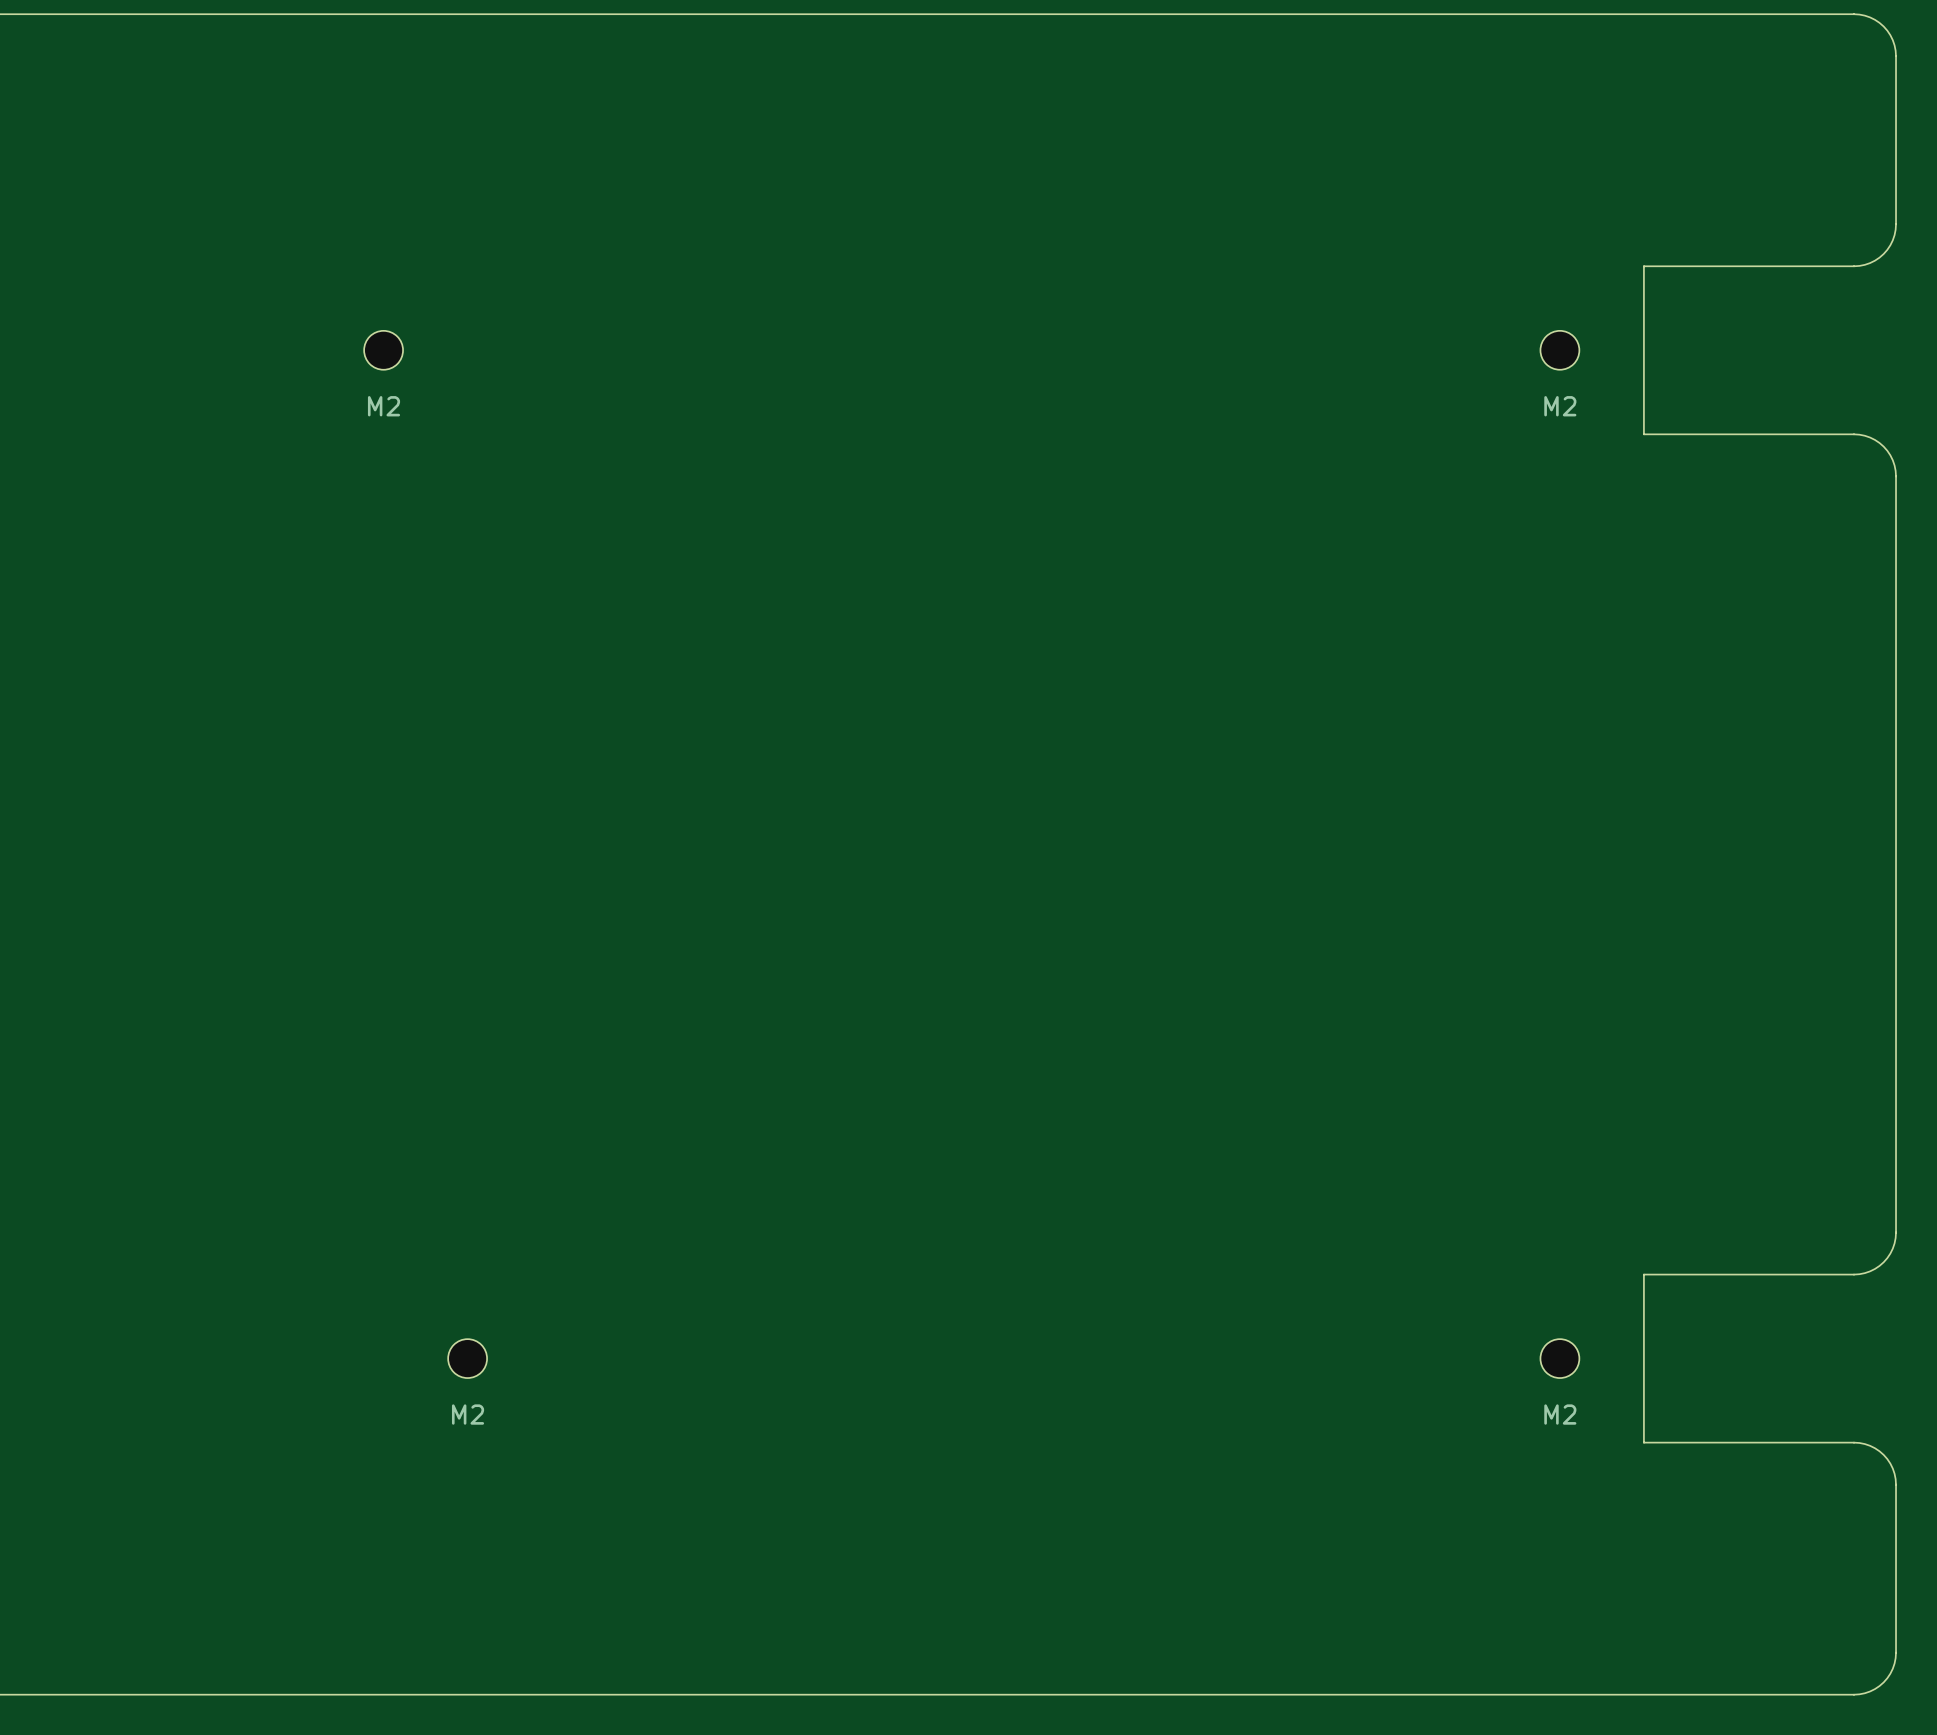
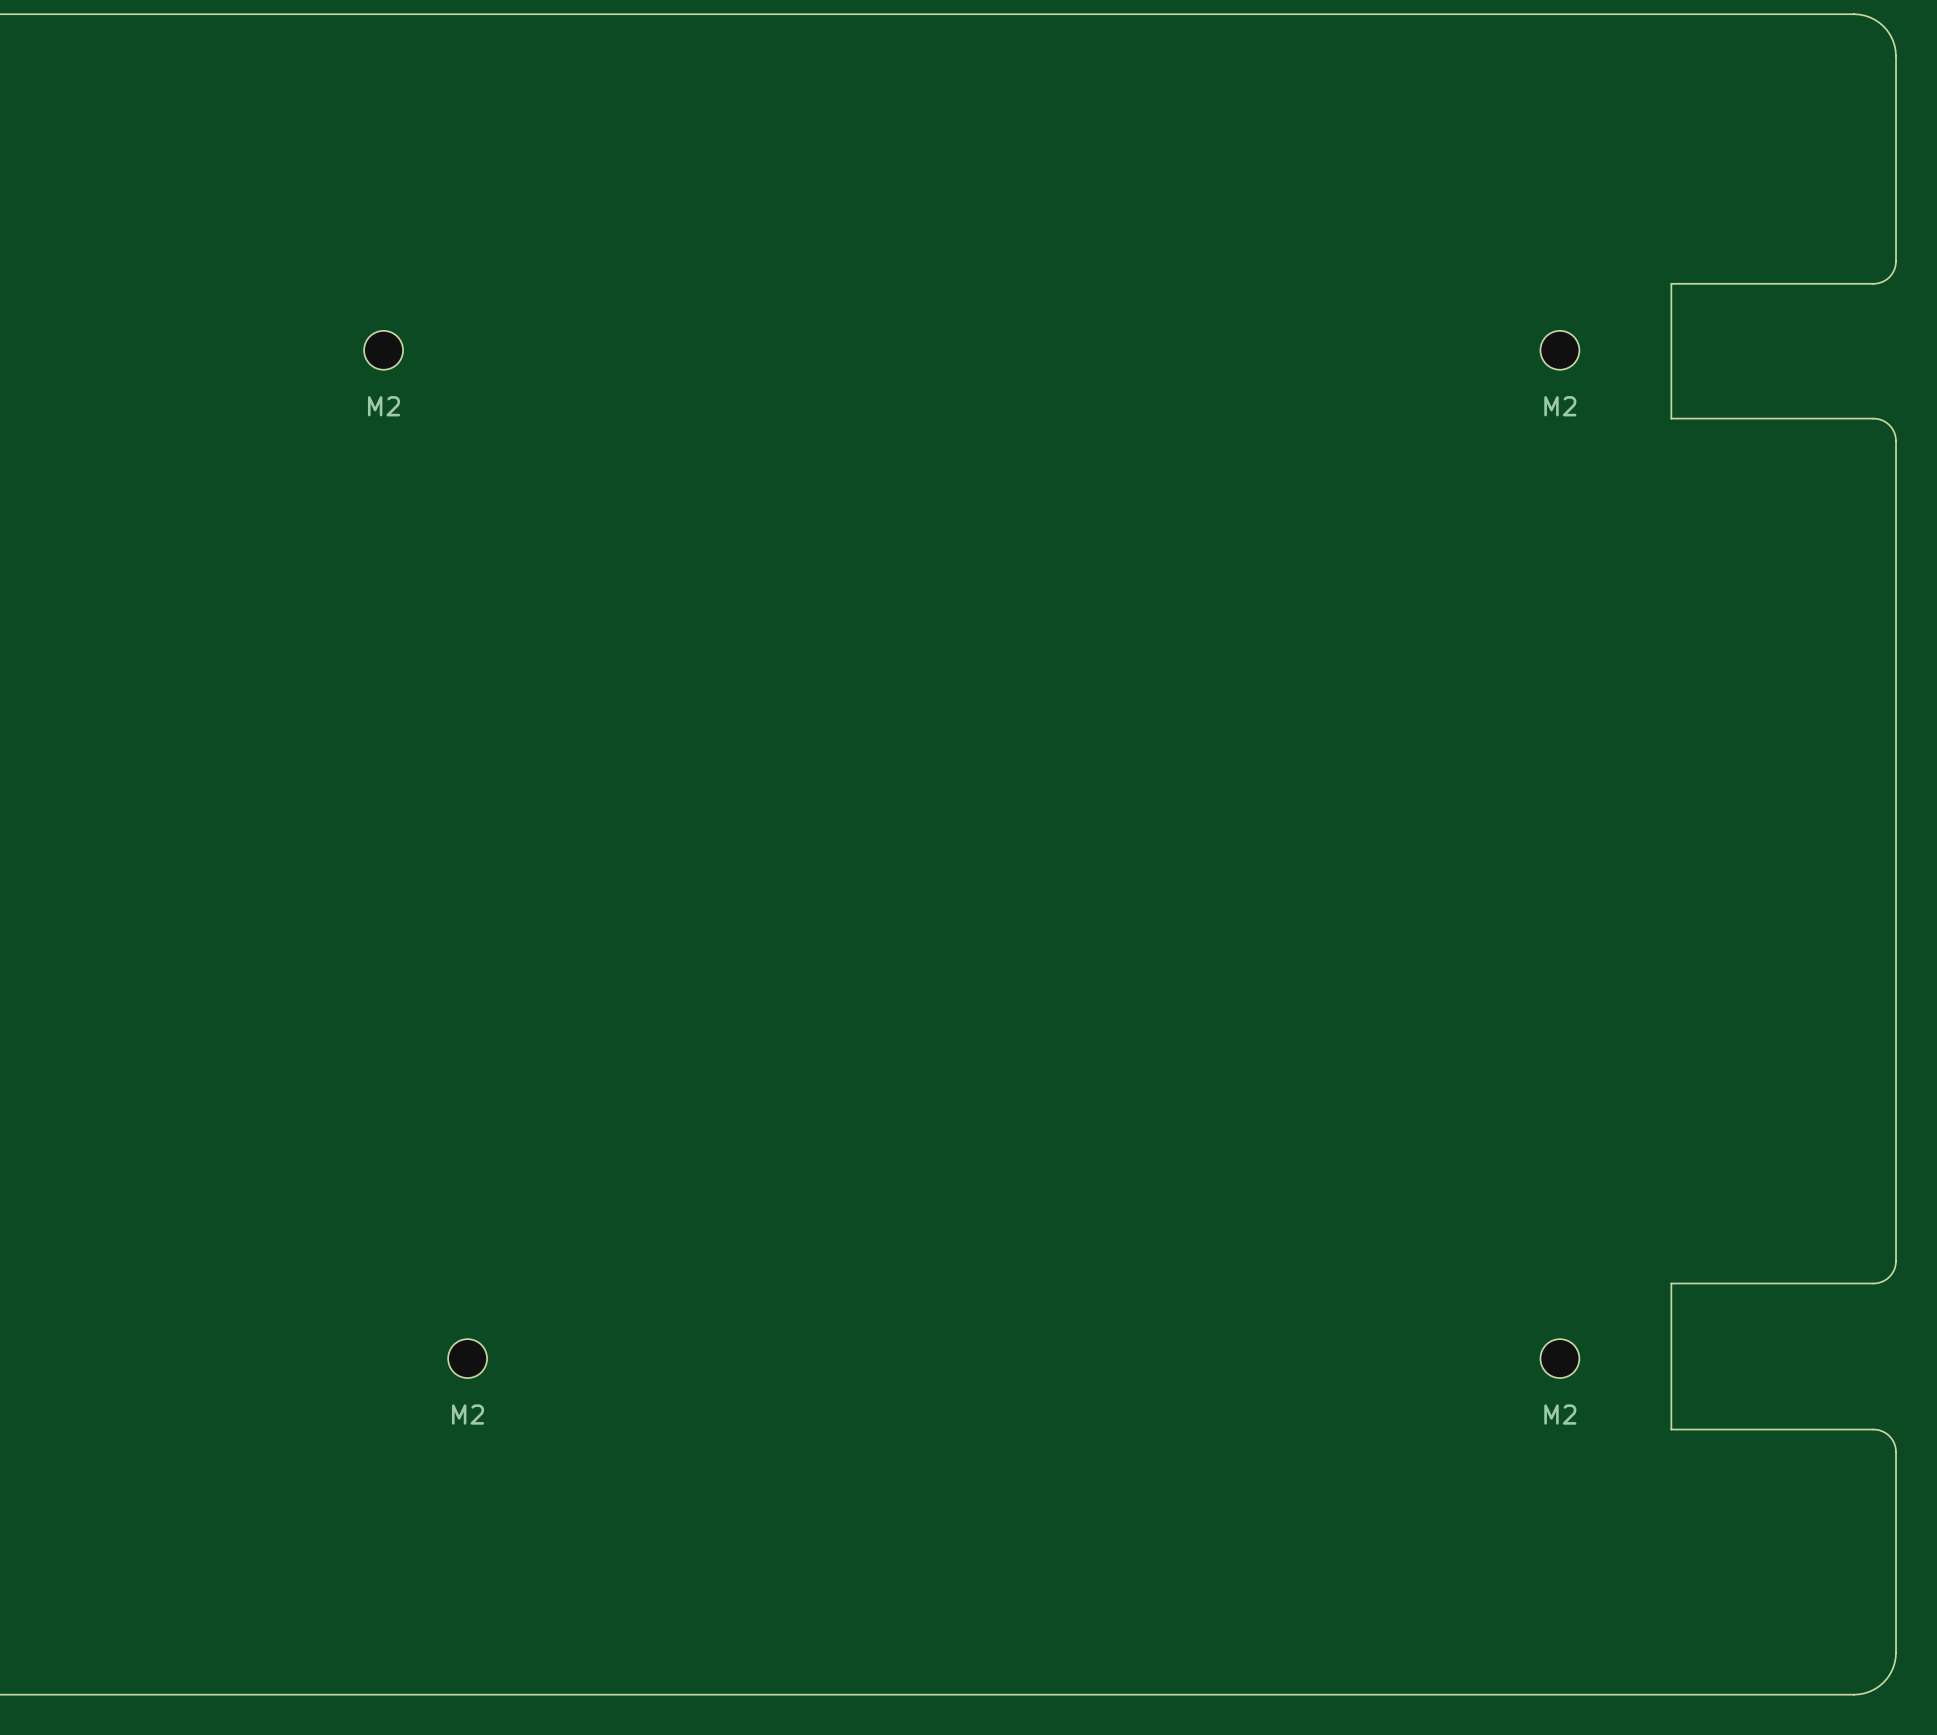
board edge: (1896, 224) (1892, 240) (1887, 249) (1875, 260) (1859, 265) (1643, 266) (1643, 434) (1859, 434) (1875, 439) (1887, 450) (1892, 460) (1896, 476) -> (1896, 224) (1895, 267) (1889, 277) (1879, 283) (1671, 283) (1671, 418) (1879, 419) (1889, 425) (1895, 435) (1896, 476)
board edge: (1896, 1232) (1892, 1248) (1887, 1258) (1875, 1268) (1859, 1274) (1643, 1274) (1643, 1442) (1859, 1442) (1875, 1448) (1887, 1459) (1892, 1468) (1896, 1484) -> (1896, 1232) (1895, 1266) (1889, 1276) (1879, 1282) (1671, 1283) (1671, 1429) (1873, 1429)
board edge: none -> (1873, 1429) (1884, 1432) (1894, 1443) (1896, 1484)

